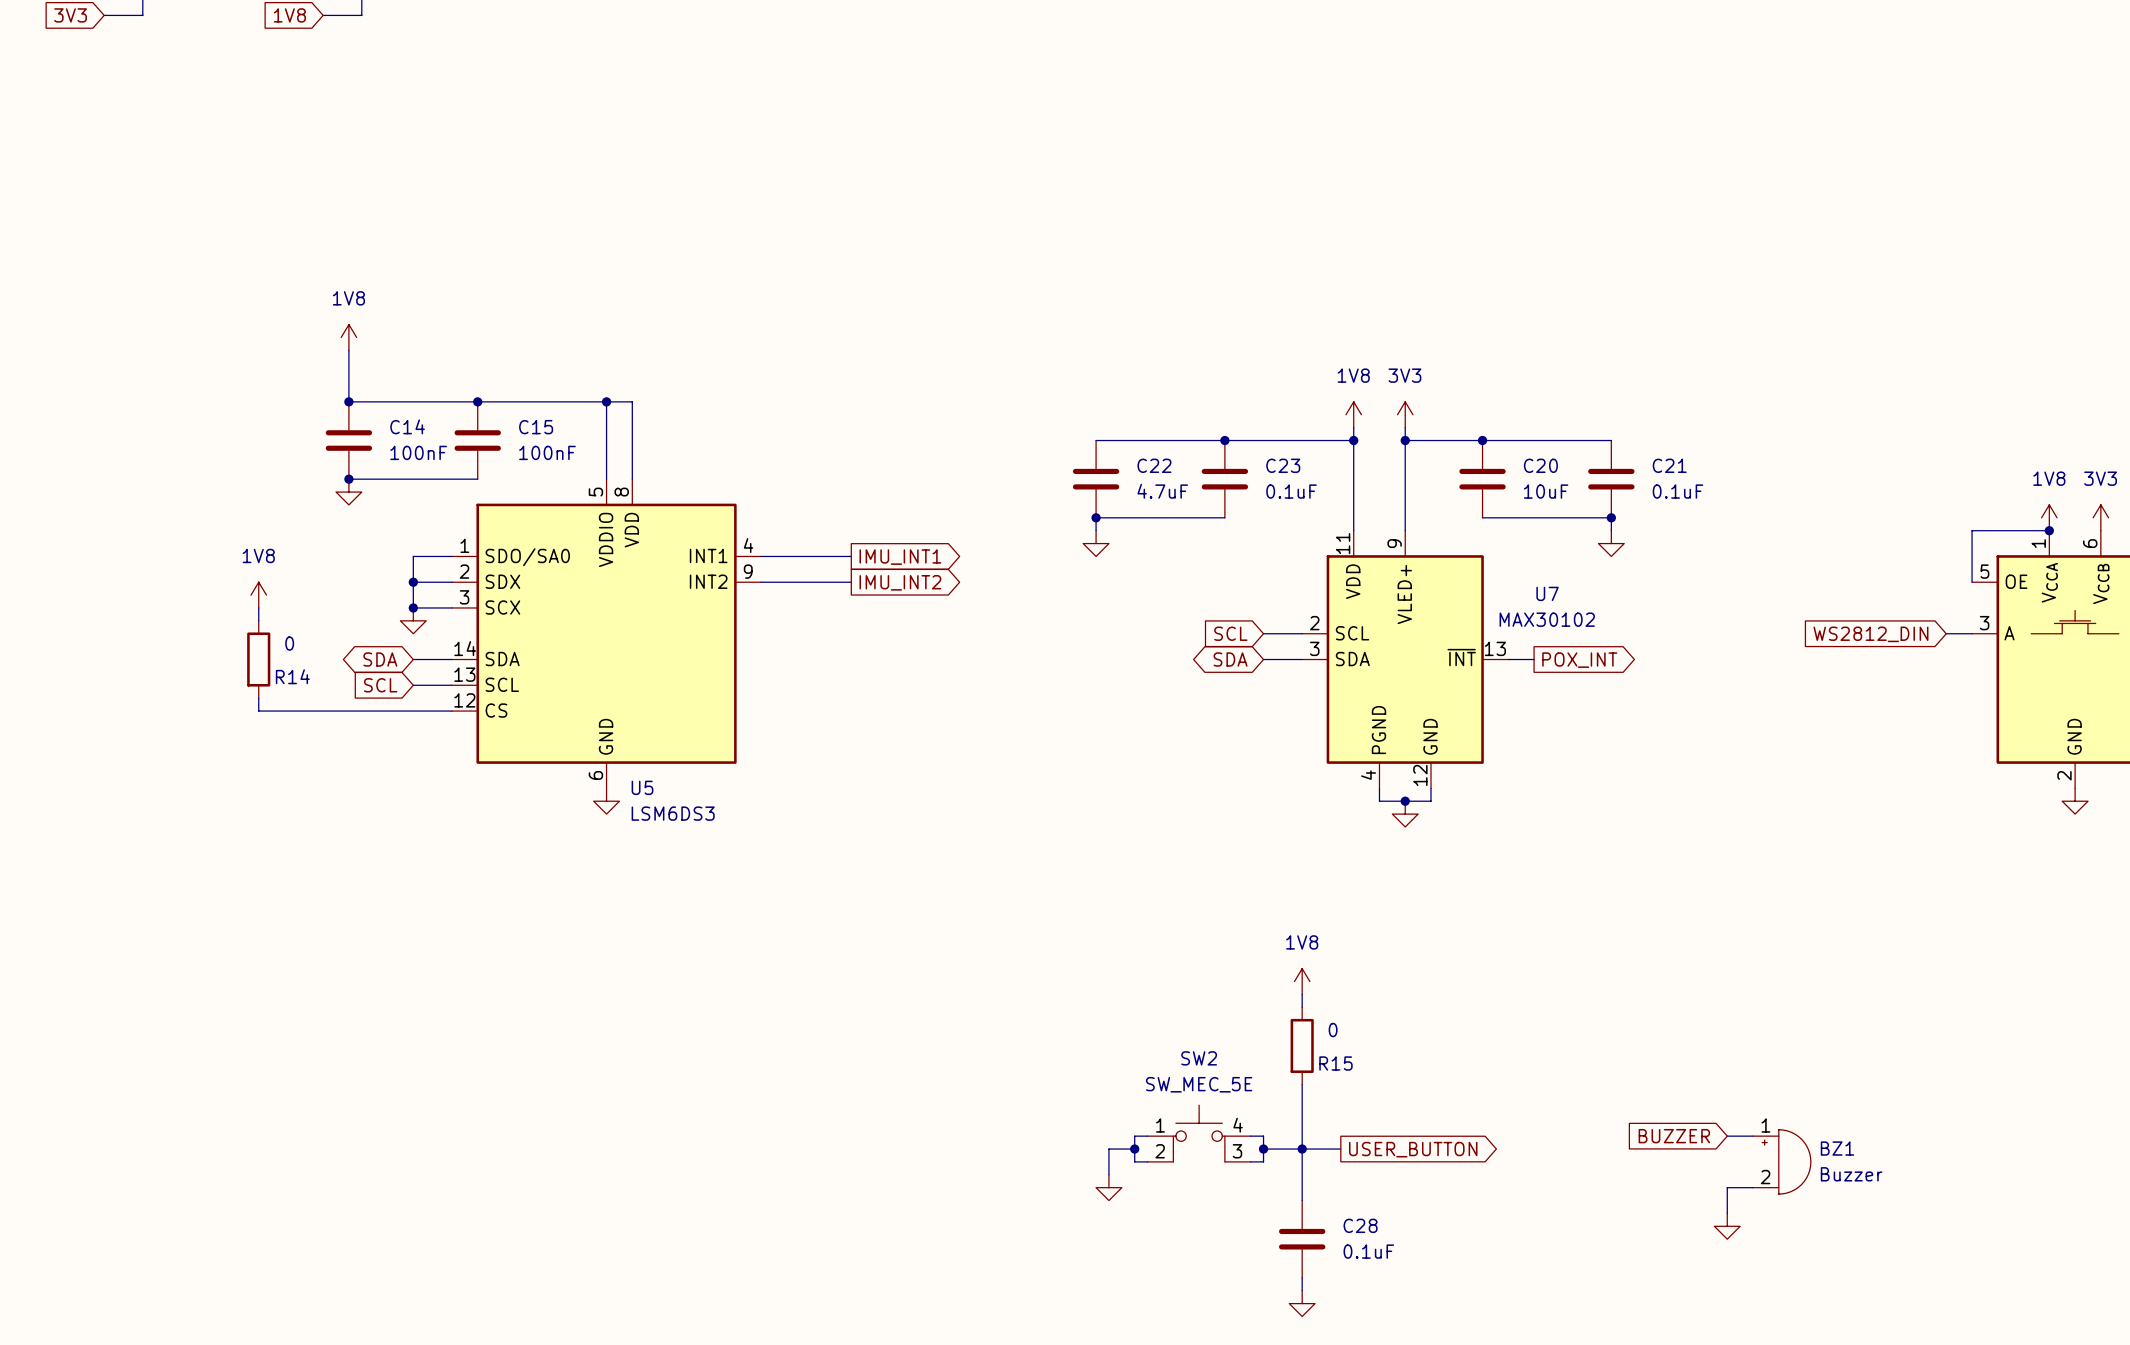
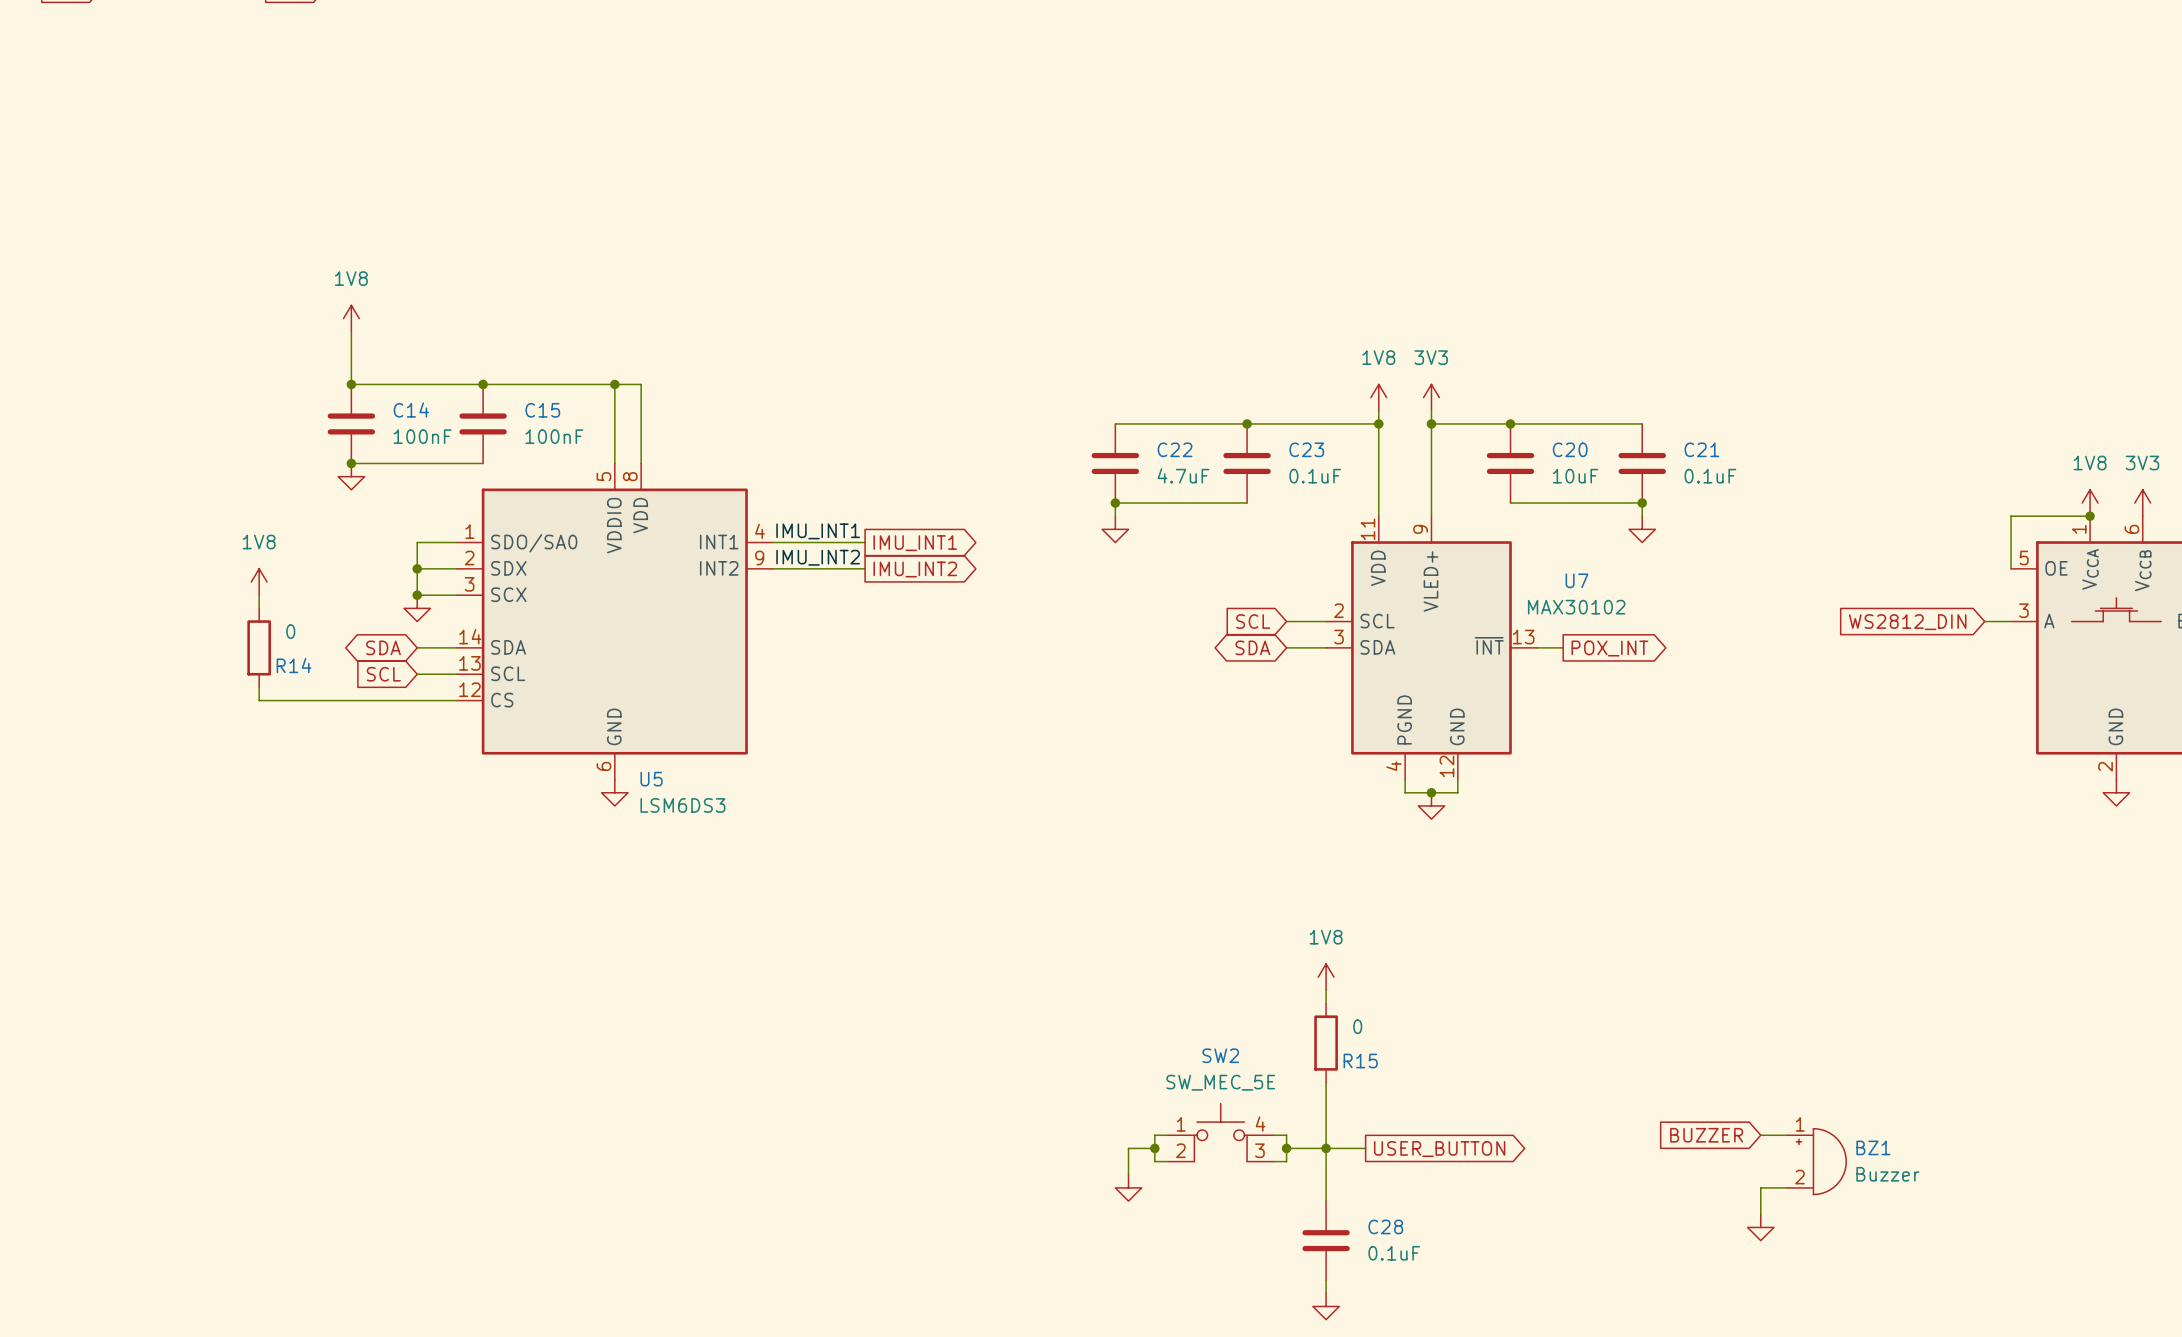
label: none -> IMU_INT1 (818, 531)
label: none -> IMU_INT2 (818, 557)

